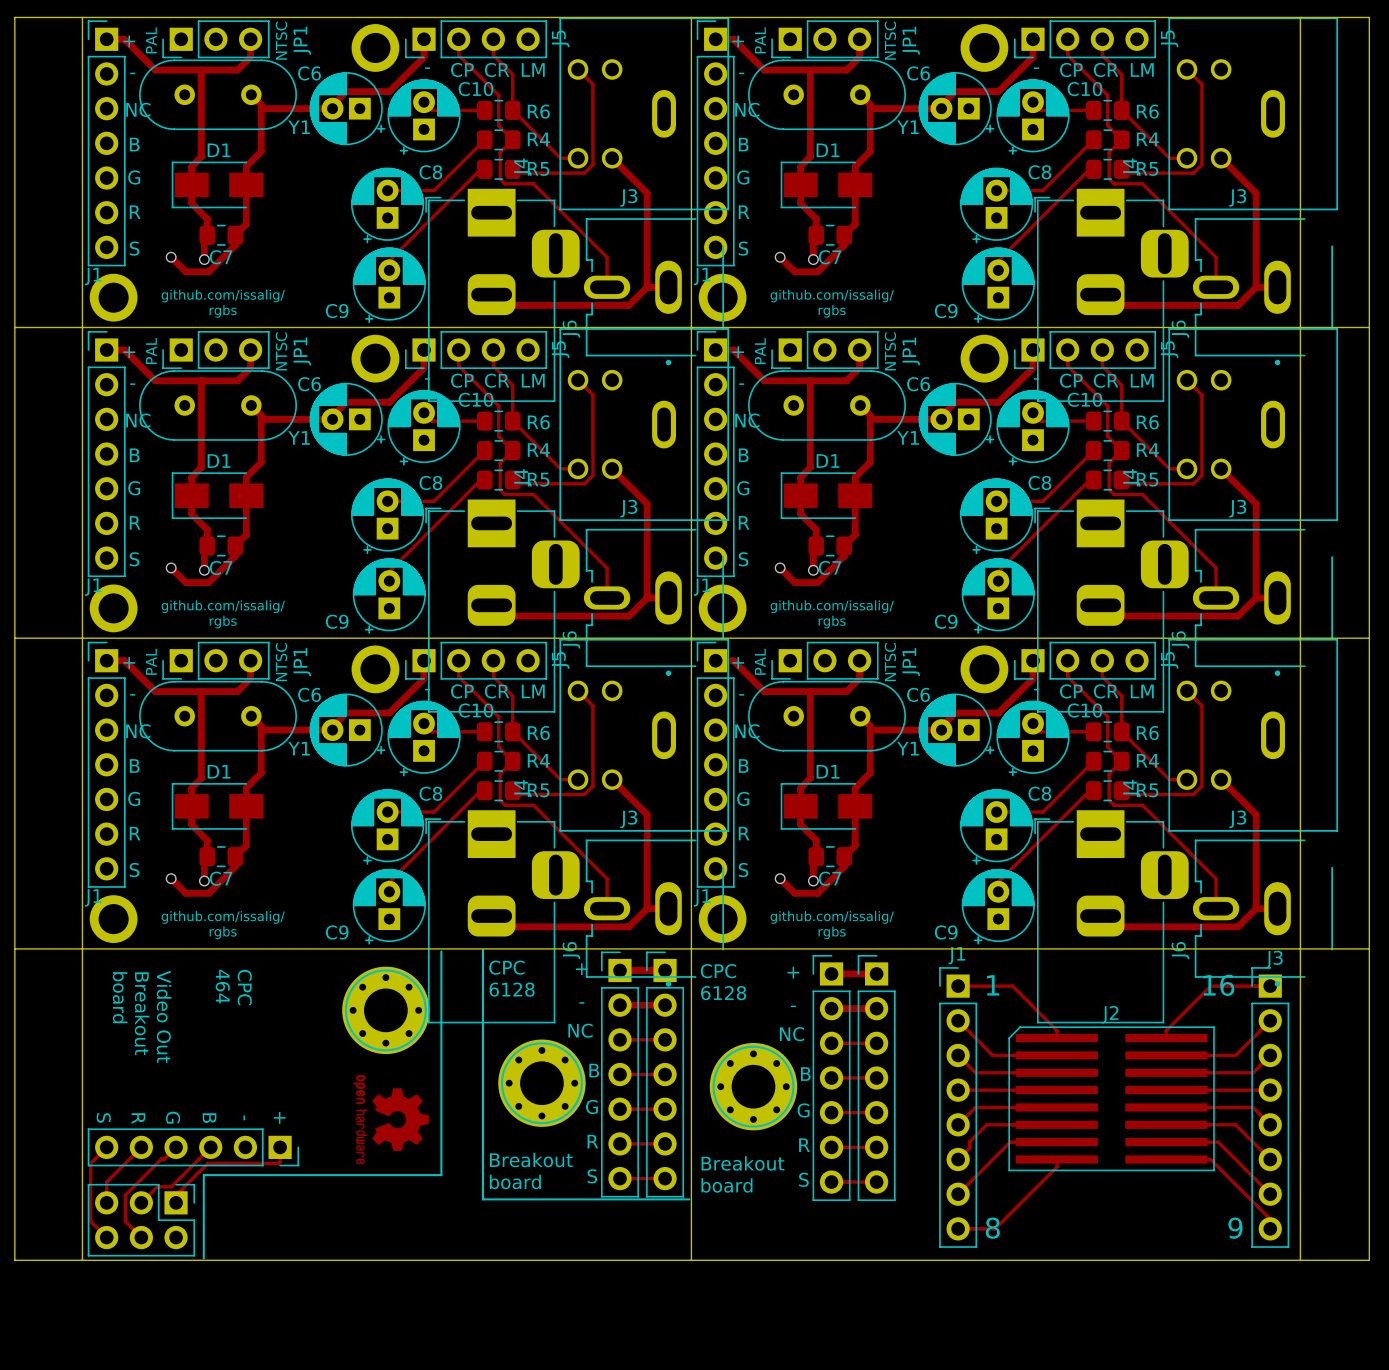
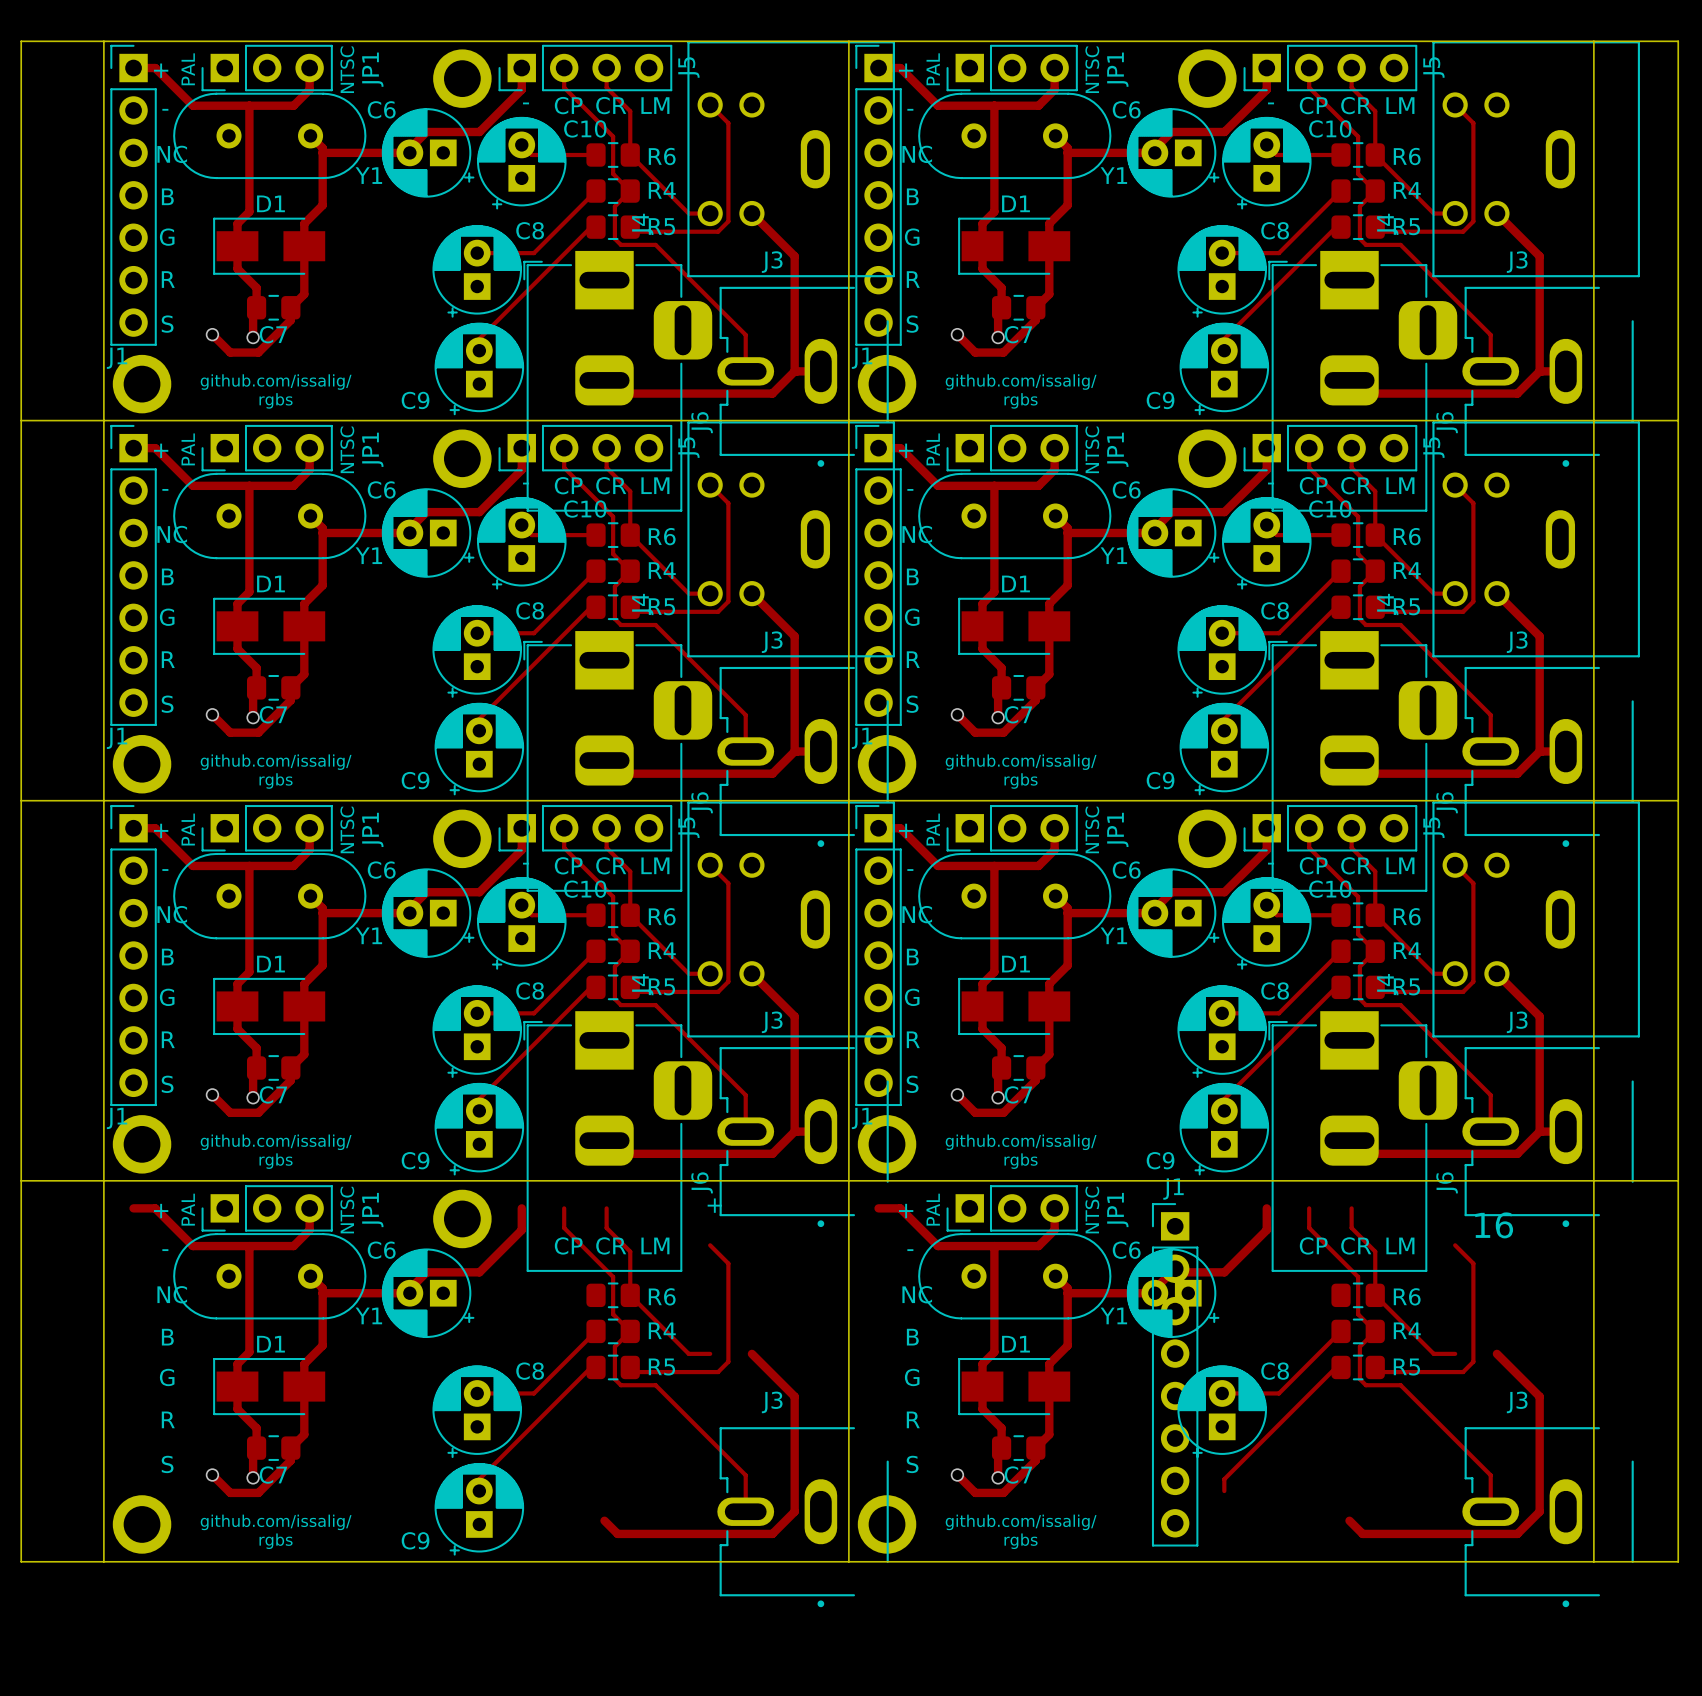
line: (482, 949) (482, 1199) (689, 1199) -> none
line: (441, 951) (441, 1175) (203, 1175) (203, 1258) -> none
text: CPC (506, 967) -> none
drawing: [344, 969, 427, 1052] -> none
track: (619, 970) (665, 970) -> none
track: none -> (133, 1208) (155, 1208) (192, 1246) (293, 1246) (309, 1230) (309, 1208)
JP1: none -> (267, 1208)
track: none -> (521, 1208) (521, 1230) (479, 1272) (426, 1272) (409, 1289) (409, 1293) (322, 1293)
track: none -> (564, 1208) (564, 1228) (613, 1276) (613, 1314) (630, 1331) (614, 1346) (614, 1379) (620, 1385) (655, 1385) (745, 1475) (745, 1511)
track: none -> (606, 1208) (606, 1228) (630, 1251) (630, 1295) (688, 1353) (710, 1353)
track: none -> (878, 1208) (900, 1208) (937, 1246) (1038, 1246) (1054, 1230) (1054, 1208)
text: CPC (718, 971) -> none
JP1: none -> (1012, 1208)
track: none -> (1266, 1208) (1266, 1230) (1224, 1272) (1171, 1272) (1154, 1289) (1154, 1293) (1067, 1293)
track: none -> (1309, 1208) (1309, 1228) (1358, 1276) (1358, 1314) (1375, 1331) (1359, 1346) (1359, 1379) (1365, 1385) (1400, 1385) (1490, 1475) (1490, 1511)
track: none -> (1351, 1208) (1351, 1228) (1375, 1251) (1375, 1295) (1433, 1353) (1455, 1353)
text: none -> PAL (188, 1209)
text: none -> NTSC (347, 1210)
text: none -> PAL (933, 1209)
text position: + (793, 972) -> + (906, 1211)
text: none -> NTSC (1092, 1210)
track: (831, 973) (876, 973) -> none
part: none -> (462, 1218)
text: 1 (993, 985) -> none
text: 464 (222, 986) -> none
track: (958, 986) (1012, 986) (1056, 1030) (1056, 1038) -> none
track: (1270, 986) (1210, 986) (1166, 1030) (1166, 1038) -> none
text: CPC (244, 987) -> none
text: 6128 (512, 989) -> none
text: 6128 (723, 993) -> none
text: board (120, 997) -> none
track: none -> (710, 1245) (728, 1263) (728, 1361) (718, 1372) (634, 1372) (630, 1367)
track: none -> (1455, 1245) (1473, 1263) (1473, 1361) (1463, 1372) (1379, 1372) (1375, 1367)
track: none -> (249, 1246) (249, 1352) (237, 1364) (237, 1409) (256, 1428) (256, 1448) (253, 1451) (253, 1477)
text: none -> CP (568, 1245)
text: none -> CR (611, 1245)
text: none -> LM (655, 1245)
text: - (581, 1002) -> none
track: none -> (994, 1246) (994, 1352) (982, 1364) (982, 1409) (1001, 1428) (1001, 1448) (998, 1451) (998, 1477)
text: none -> CP (1313, 1245)
text: none -> CR (1356, 1245)
text: none -> LM (1400, 1245)
track: (619, 1005) (665, 1005) -> none
text position: - (793, 1006) -> - (910, 1250)
track: (831, 1008) (876, 1008) -> none
part: (385, 1010) -> none
text: Breakout (142, 1013) -> none
text: Video Out (164, 1016) -> none
track: (958, 1020) (992, 1055) (1056, 1055) -> none
track: (1270, 1020) (1235, 1055) (1166, 1055) -> none
Y1: none -> (269, 1276)
track: none -> (310, 1276) (322, 1288) (322, 1345) (304, 1364) (304, 1434) (290, 1448) (290, 1460) (258, 1492) (230, 1492) (212, 1475)
Y1: none -> (1014, 1276)
track: none -> (1055, 1276) (1067, 1288) (1067, 1345) (1049, 1364) (1049, 1434) (1035, 1448) (1035, 1460) (1003, 1492) (975, 1492) (957, 1475)
text: NC (580, 1030) -> none
text position: NC (792, 1034) -> NC (917, 1294)
track: (619, 1039) (665, 1039) -> none
C6: none -> (428, 1293)
C6: none -> (1173, 1293)
text: none -> NC (172, 1294)
R6: none -> (613, 1295)
drawing: [500, 1042, 583, 1125] -> none
R6: none -> (1358, 1295)
track: (831, 1043) (876, 1043) -> none
drawing: [712, 1045, 795, 1128] -> none
track: (958, 1055) (975, 1072) (1056, 1072) -> none
track: (1270, 1055) (1252, 1072) (1166, 1072) -> none
text: B (594, 1070) -> none
track: none -> (596, 1331) (533, 1393) (477, 1393)
R4: none -> (613, 1331)
track: none -> (1341, 1331) (1278, 1393) (1222, 1393)
R4: none -> (1358, 1331)
drawing: [353, 1074, 429, 1165] -> none
track: (619, 1074) (665, 1074) -> none
part: (619, 1074) -> none
part: (665, 1074) -> none
text position: B (805, 1074) -> B (912, 1337)
track: (831, 1078) (876, 1078) -> none
part: (831, 1078) -> none
part: (876, 1078) -> none
part: (541, 1083) -> none
part: (753, 1086) -> none
track: none -> (751, 1353) (794, 1396) (794, 1511) (772, 1533) (617, 1533) (604, 1520)
track: (958, 1090) (1027, 1090) -> none
track: (1166, 1090) (1270, 1090) -> none
track: none -> (1496, 1353) (1539, 1396) (1539, 1511) (1517, 1533) (1362, 1533) (1349, 1520)
J2: (1111, 1098) -> none
track: none -> (596, 1367) (591, 1367) (479, 1479) (479, 1491)
R5: none -> (613, 1367)
track: none -> (1341, 1367) (1336, 1367) (1224, 1479) (1224, 1491)
R5: none -> (1358, 1367)
text: G (591, 1106) -> none
track: (1056, 1107) (975, 1107) (958, 1124) -> none
track: (1166, 1107) (1252, 1107) (1270, 1124) -> none
J3: (1270, 1107) -> none
track: (619, 1109) (665, 1109) -> none
text position: G (803, 1110) -> G (912, 1377)
track: (831, 1112) (876, 1112) -> none
text rotation: 0° (103, 1117) -> 90° counterclockwise (167, 1464)
text position: S (103, 1117) -> S (167, 1464)
text rotation: 0° (173, 1117) -> 90° counterclockwise (167, 1377)
text position: G (173, 1117) -> G (167, 1377)
D1: none -> (269, 1386)
text rotation: 0° (244, 1117) -> 90° counterclockwise (165, 1250)
text position: - (244, 1117) -> - (165, 1250)
text rotation: 0° (279, 1117) -> 90° counterclockwise (161, 1211)
text position: + (279, 1117) -> + (161, 1211)
D1: none -> (1014, 1386)
text rotation: 0° (138, 1118) -> 90° counterclockwise (168, 1419)
text rotation: 0° (209, 1118) -> 90° counterclockwise (167, 1337)
text position: B (209, 1118) -> B (167, 1337)
track: (1056, 1124) (986, 1124) (969, 1141) (969, 1147) (958, 1159) -> none
track: (1166, 1124) (1235, 1124) (1270, 1159) -> none
C8: none -> (477, 1411)
C8: none -> (1222, 1411)
text: R (592, 1141) -> none
track: (1056, 1142) (1010, 1142) (958, 1194) -> none
track: (1166, 1142) (1218, 1142) (1270, 1194) -> none
track: (619, 1143) (665, 1143) -> none
text position: R (804, 1145) -> R (913, 1419)
track: (106, 1147) (90, 1163) (90, 1221) (106, 1237) -> none
track: (141, 1147) (106, 1182) (106, 1202) -> none
track: (176, 1147) (164, 1158) (161, 1158) (125, 1195) (125, 1221) (141, 1237) -> none
part: (193, 1147) -> none
track: (210, 1147) (171, 1186) (157, 1186) (141, 1202) -> none
track: (280, 1147) (279, 1163) (207, 1163) (176, 1195) (176, 1202) (176, 1194) (182, 1194) -> none
track: (831, 1147) (876, 1147) -> none
text: Breakout (531, 1159) -> none
track: (1056, 1159) (1056, 1167) (995, 1228) (958, 1228) -> none
track: (1166, 1159) (1210, 1159) (1270, 1219) (1270, 1228) -> none
text: Breakout (742, 1163) -> none
C7: none -> (273, 1448)
C7: none -> (1018, 1448)
text: S (592, 1176) -> none
track: (619, 1178) (665, 1178) -> none
text position: S (803, 1179) -> S (912, 1464)
text: board (515, 1181) -> none
track: (831, 1182) (876, 1182) -> none
text: board (726, 1185) -> none
via: none -> (212, 1475)
via: none -> (957, 1475)
via: none -> (253, 1477)
via: none -> (998, 1477)
C9: none -> (479, 1509)
part: (141, 1220) -> none
J3: none -> (803, 1517)
J3: none -> (1548, 1517)
text: none -> github.com/issalig/ (276, 1522)
text: none -> github.com/issalig/ (1021, 1522)
text: 8 (992, 1228) -> none
text: 9 (1235, 1228) -> none
part: none -> (142, 1524)
part: none -> (887, 1524)
text: none -> rgbs (276, 1541)
text: none -> rgbs (1021, 1541)

